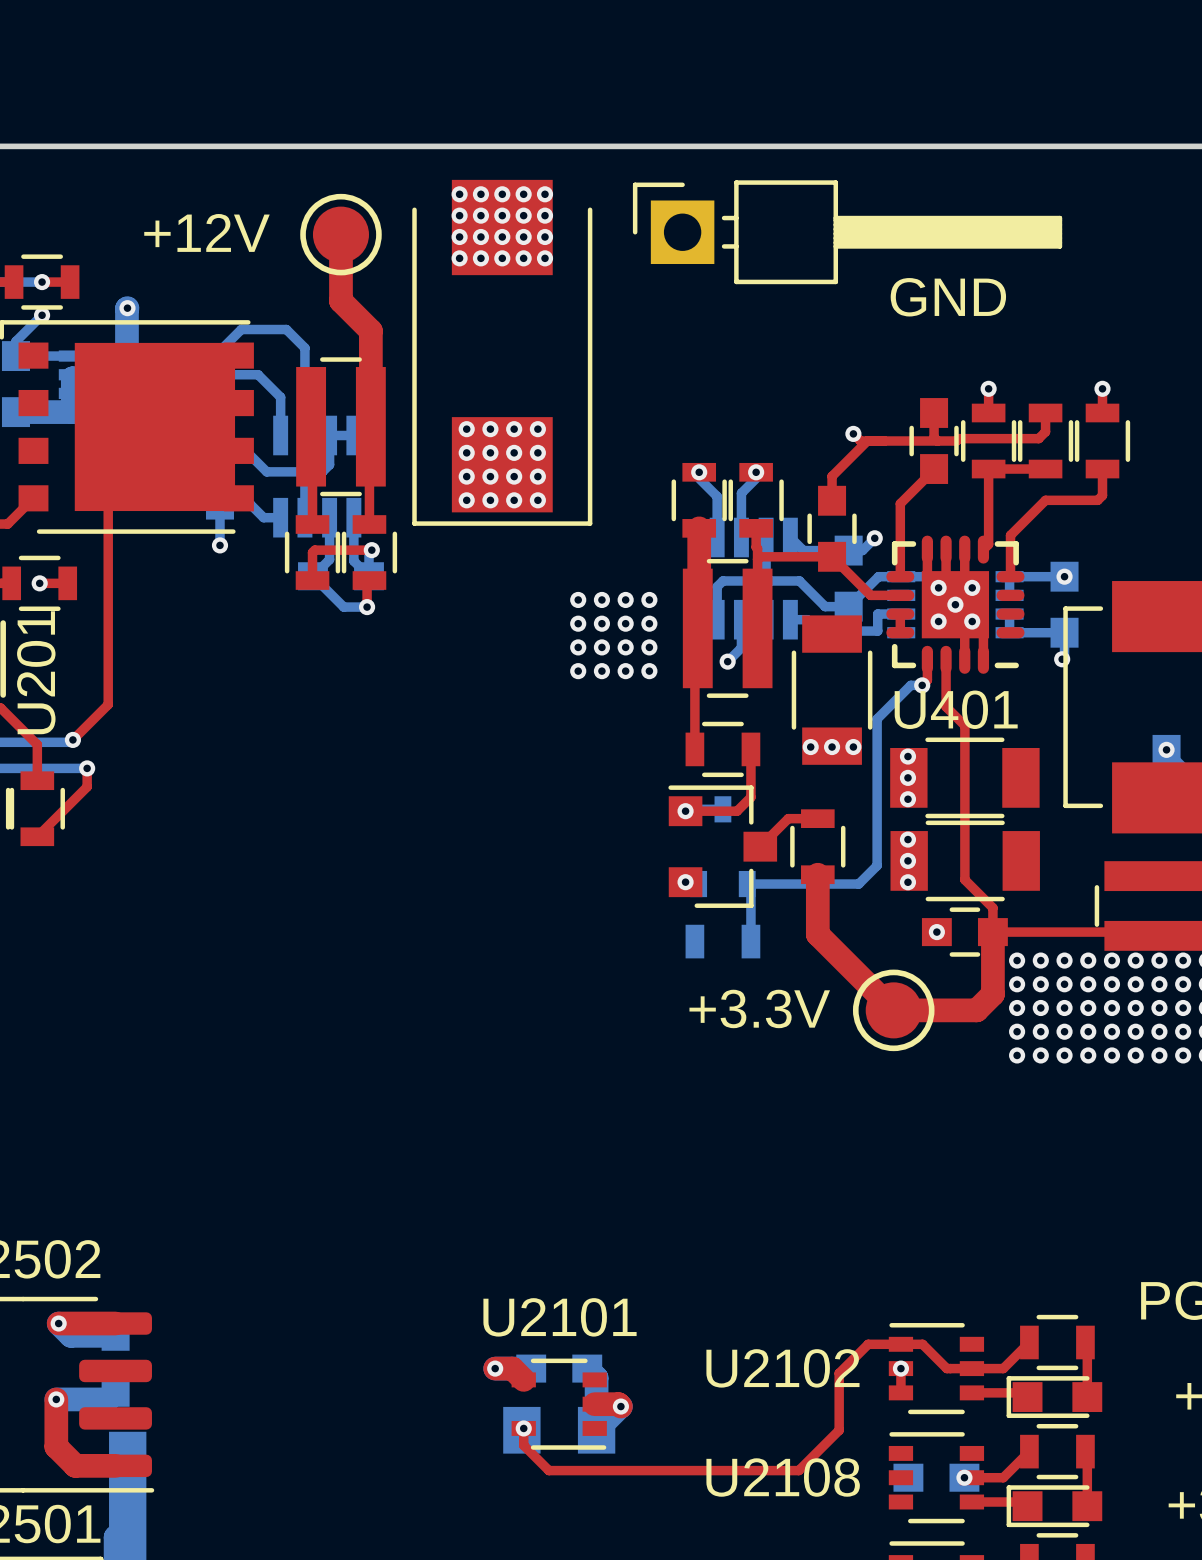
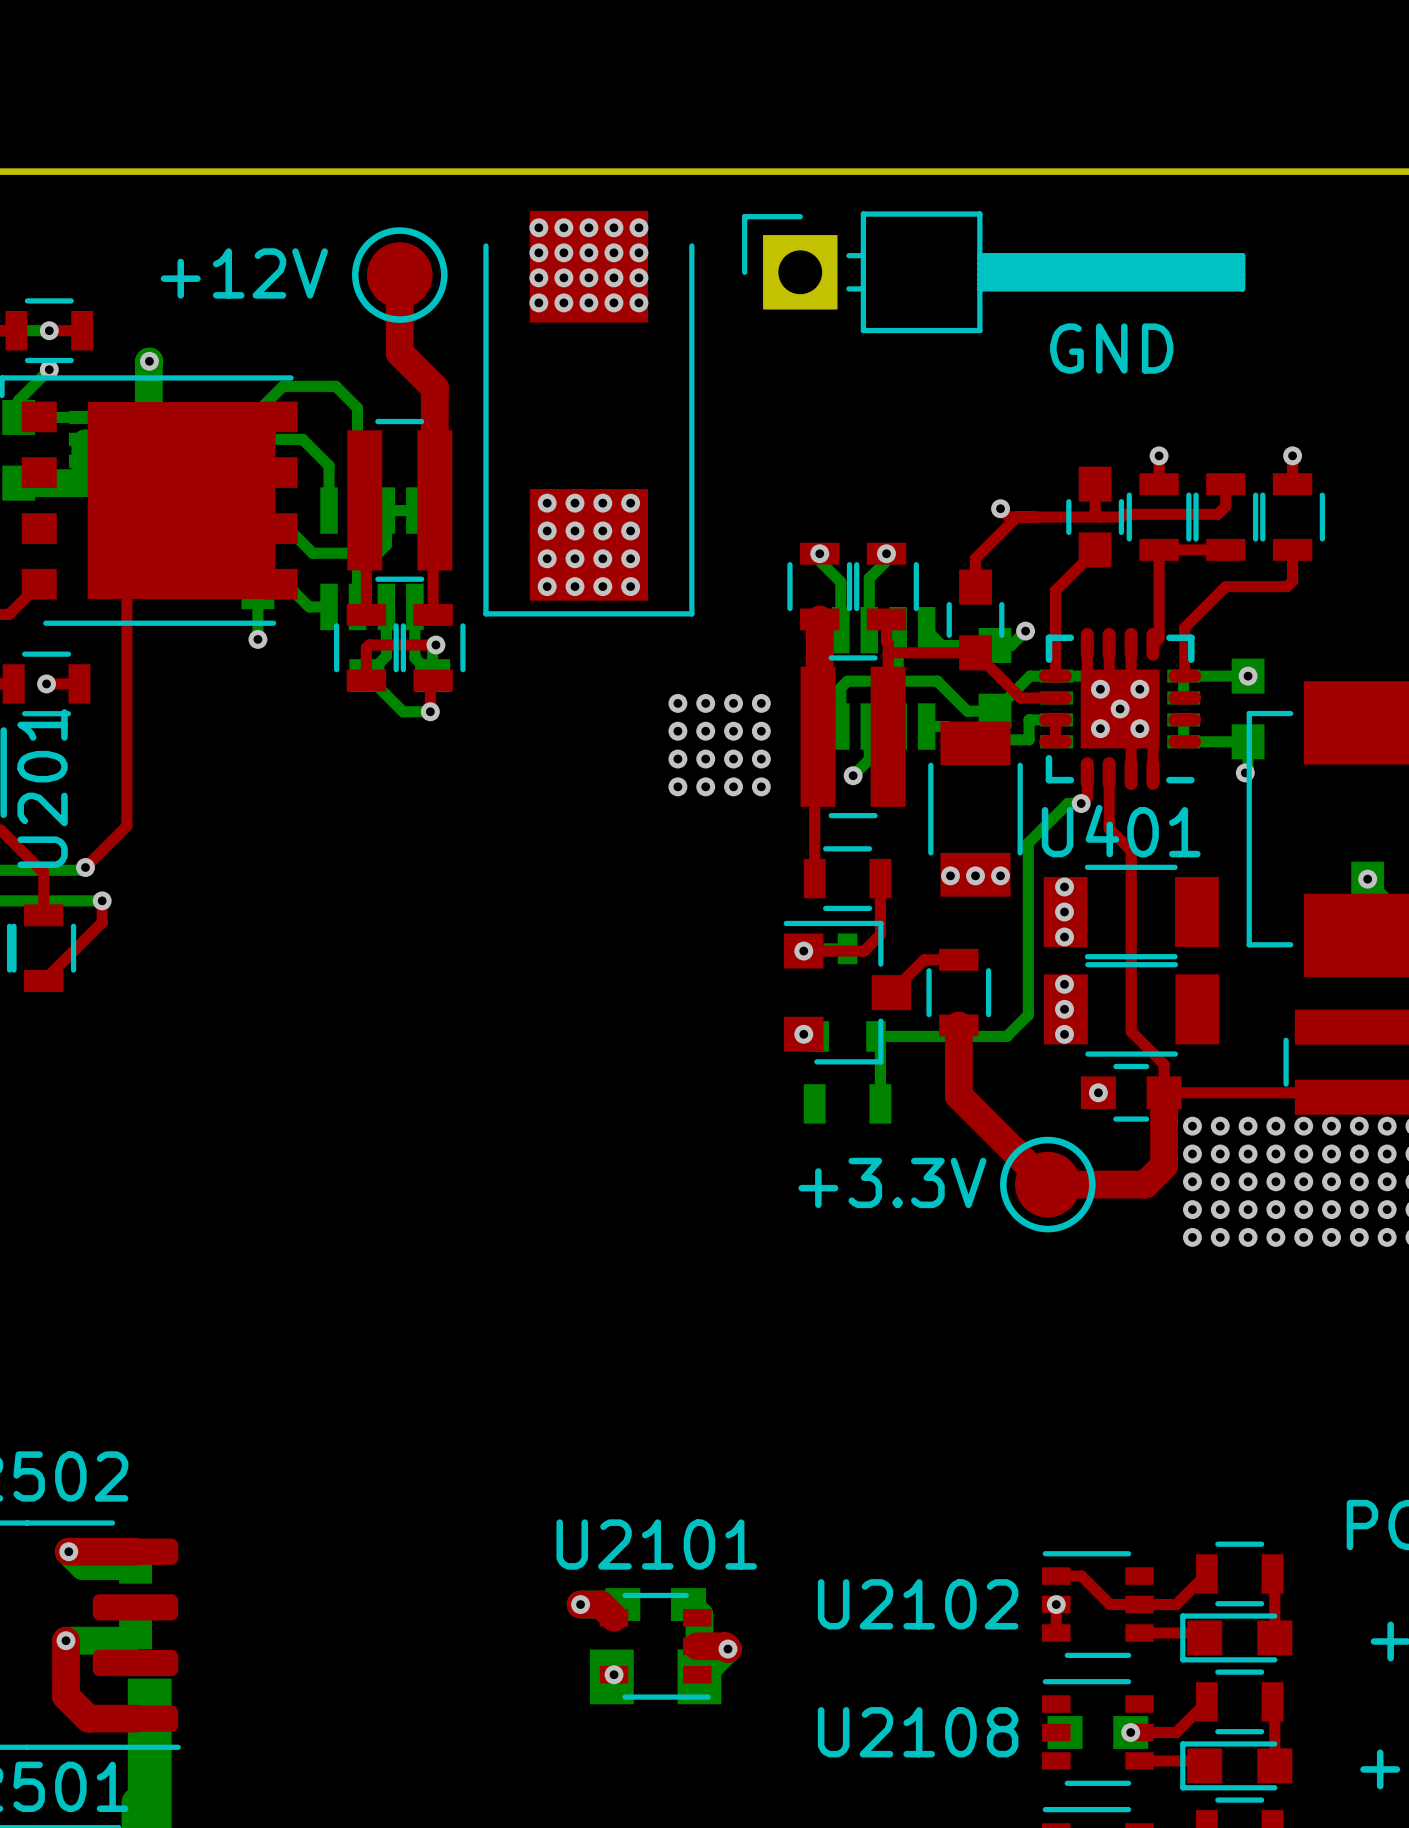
top track: (900, 1344) (868, 1344) (839, 1373) (839, 1430) (798, 1470) (548, 1470) (523, 1445) (523, 1428) -> none

